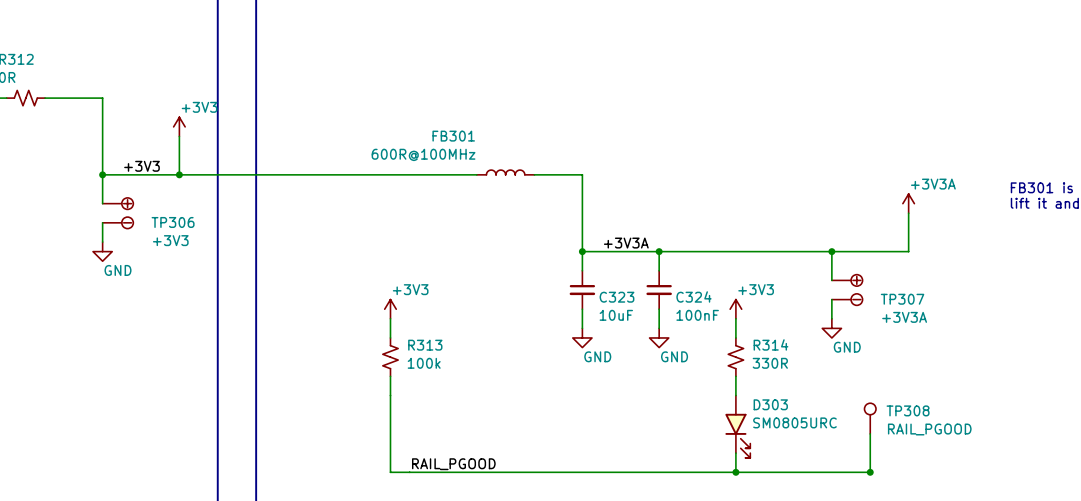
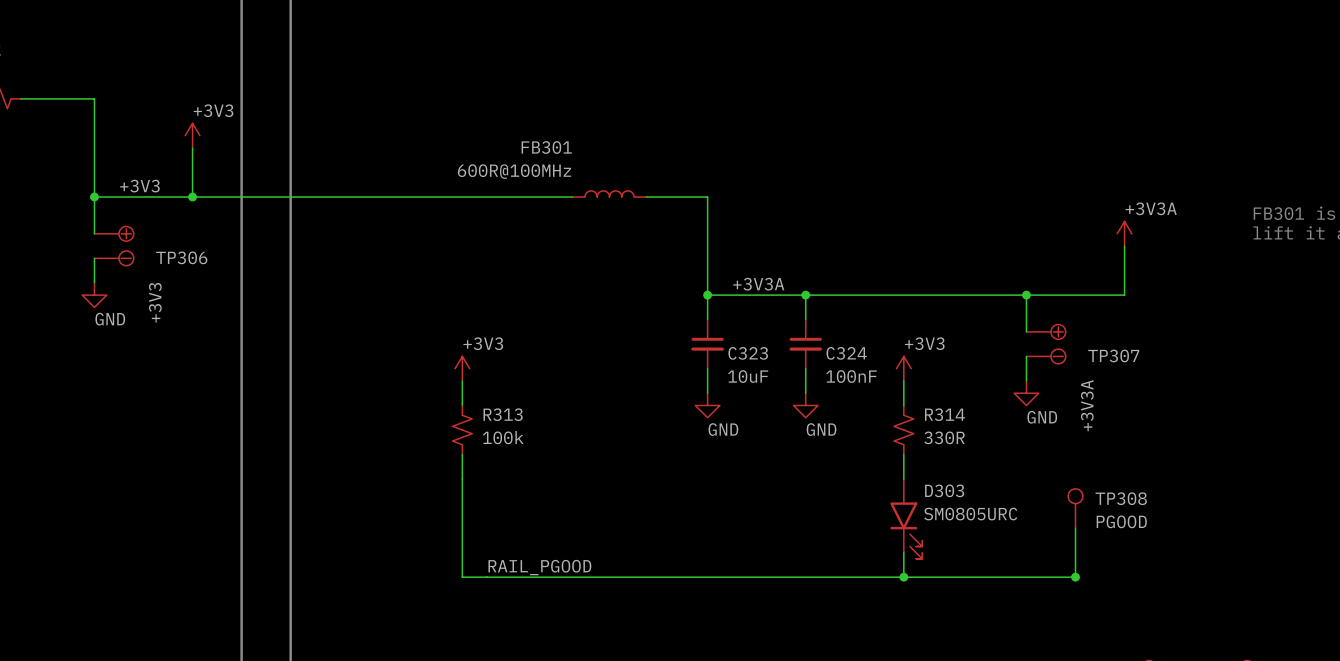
TP306 value rotation: 0° (170, 240) -> 90° counterclockwise (155, 302)
TP307 value rotation: 0° (904, 317) -> 90° counterclockwise (1087, 405)
TP308 value: RAIL_PGOOD (929, 429) -> PGOOD (1121, 521)

